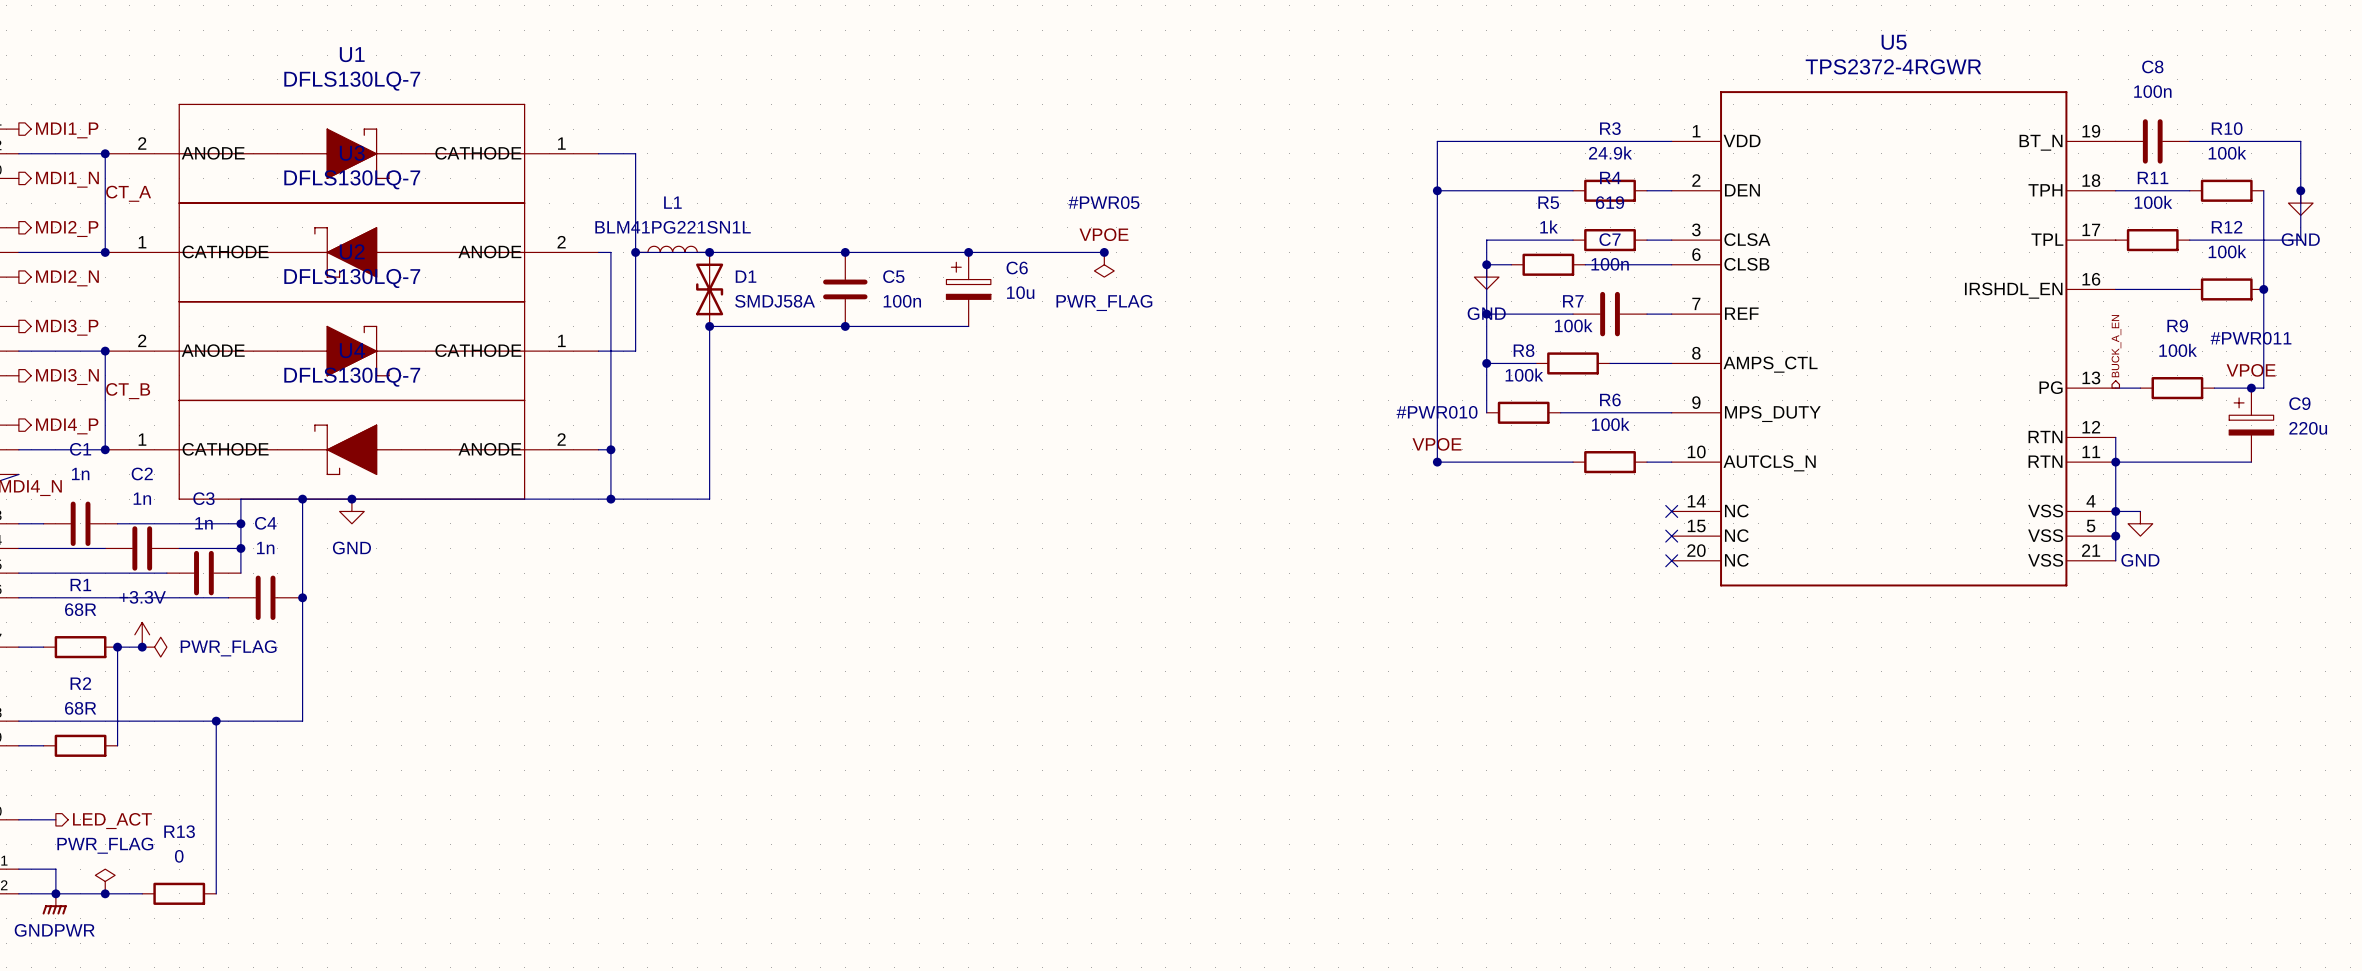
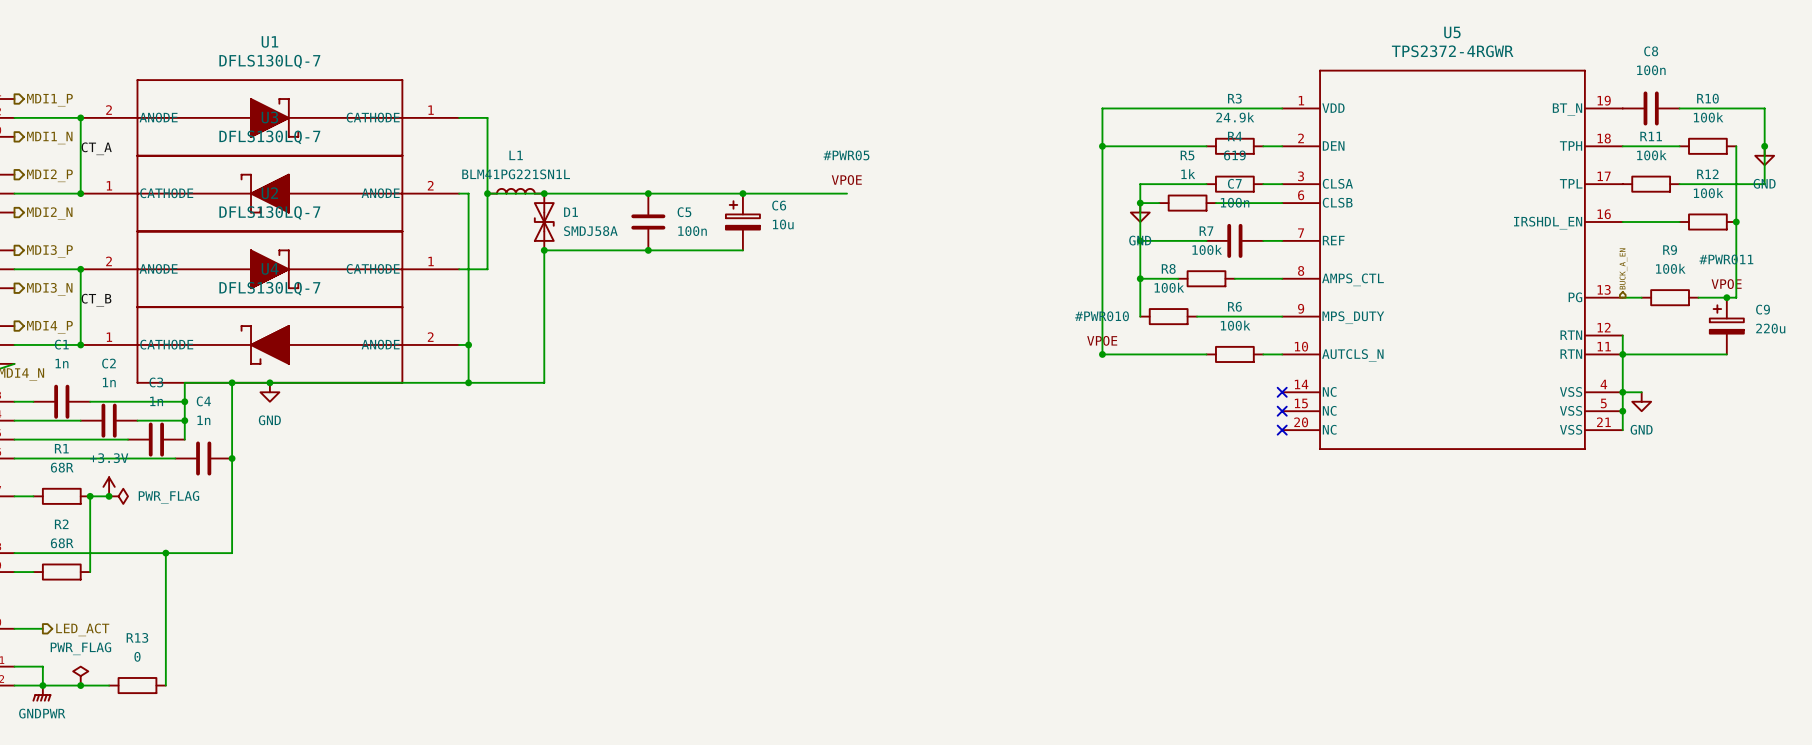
junction: (1104, 252) -> none
power symbol: PWR_FLAG (1104, 264) -> none

